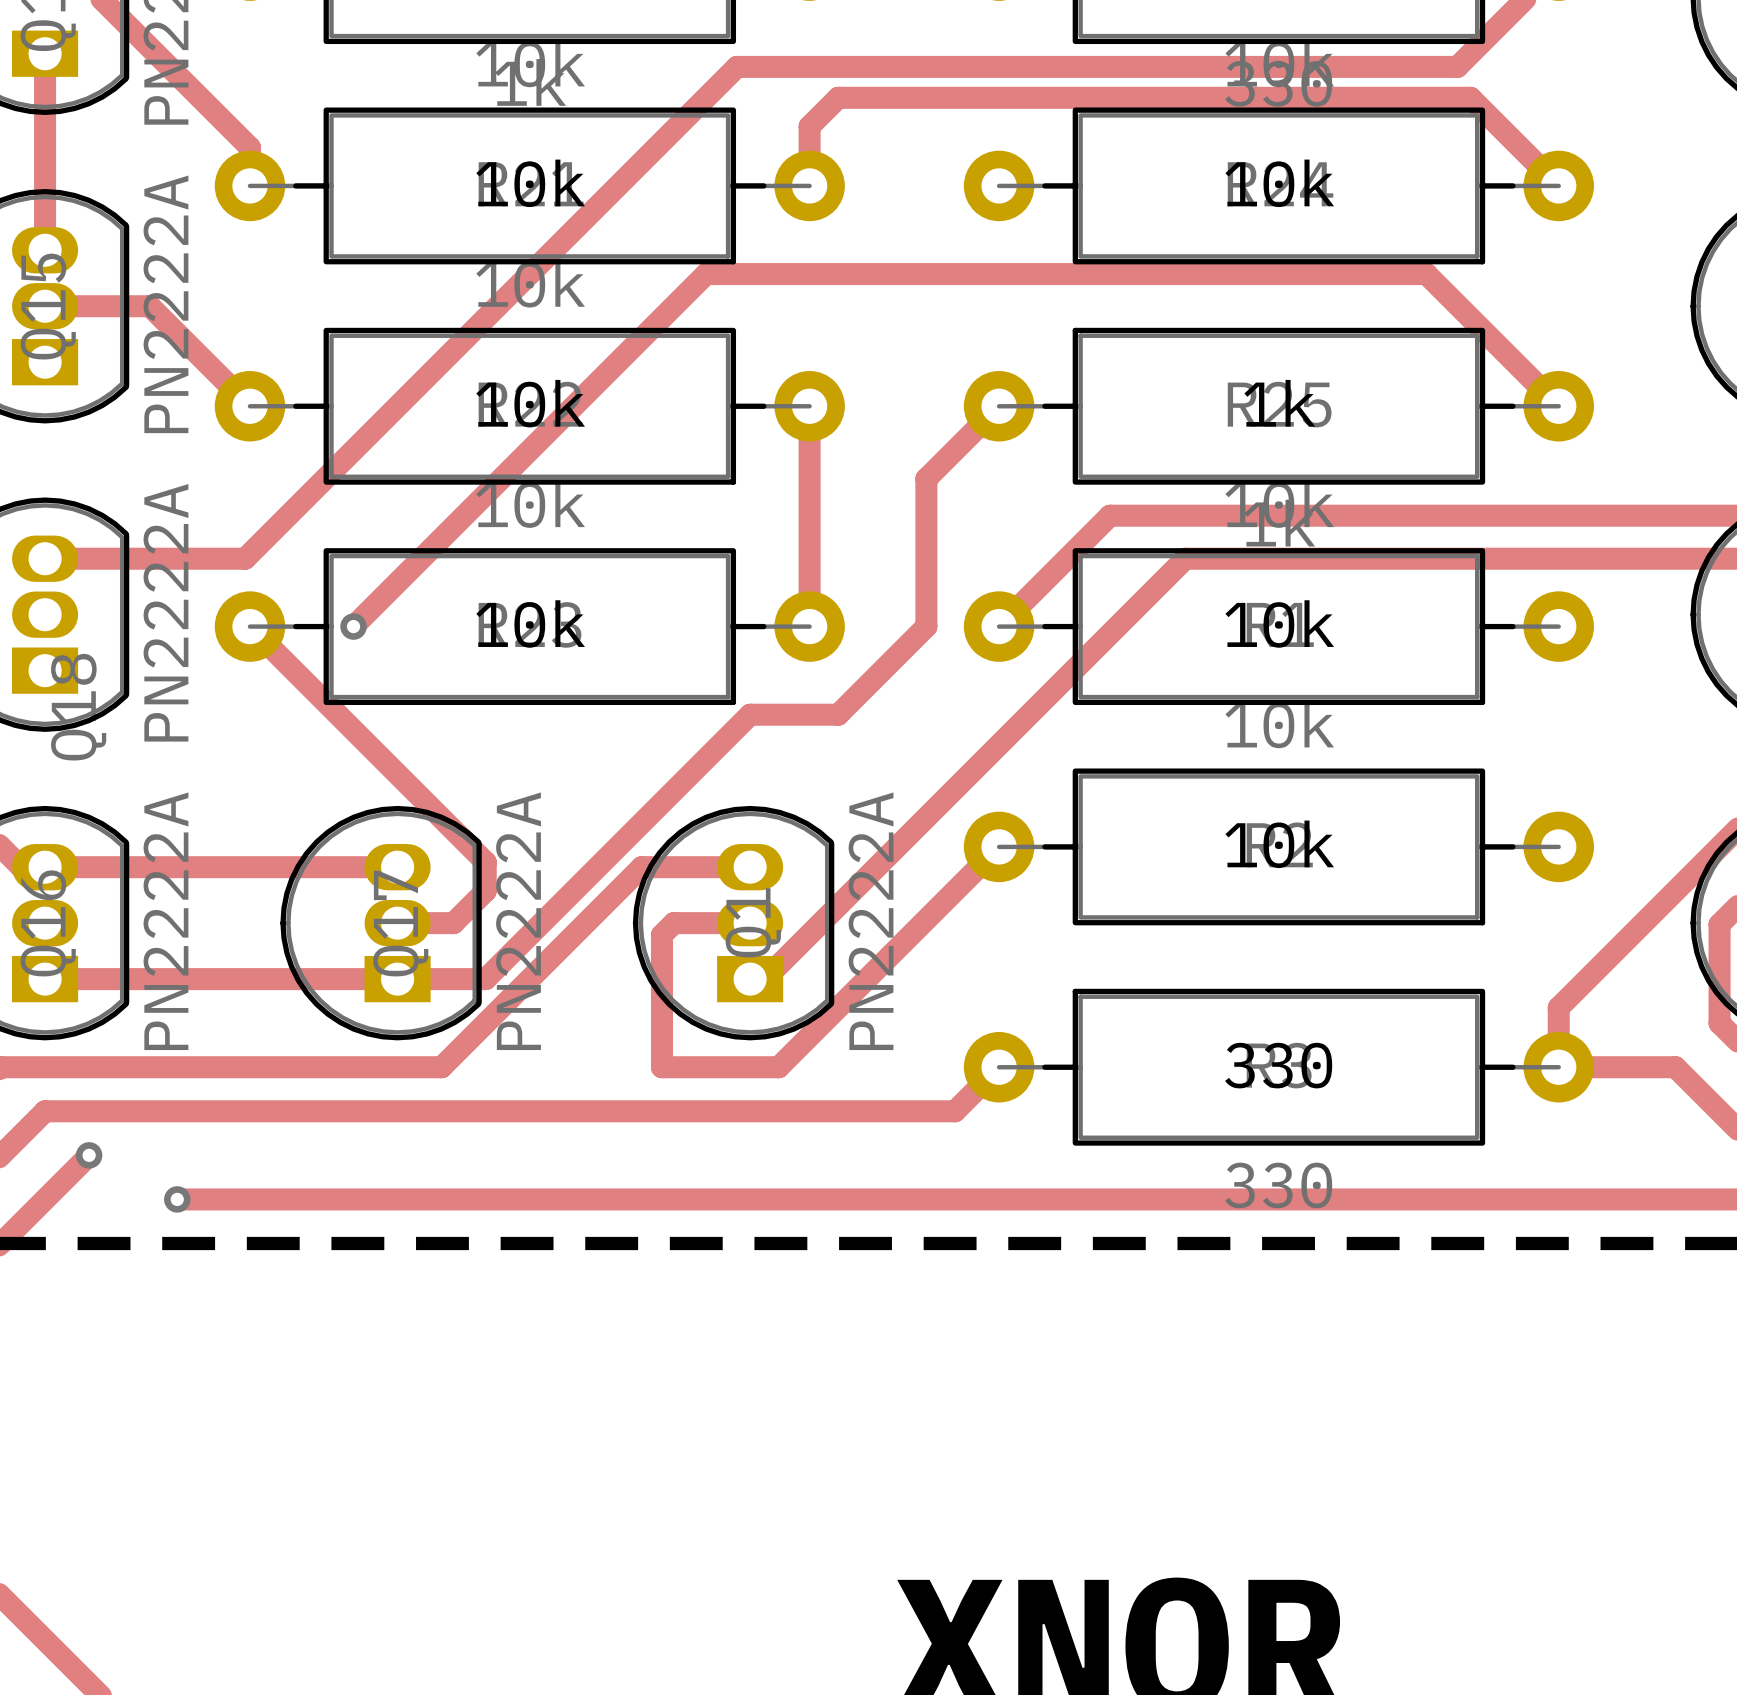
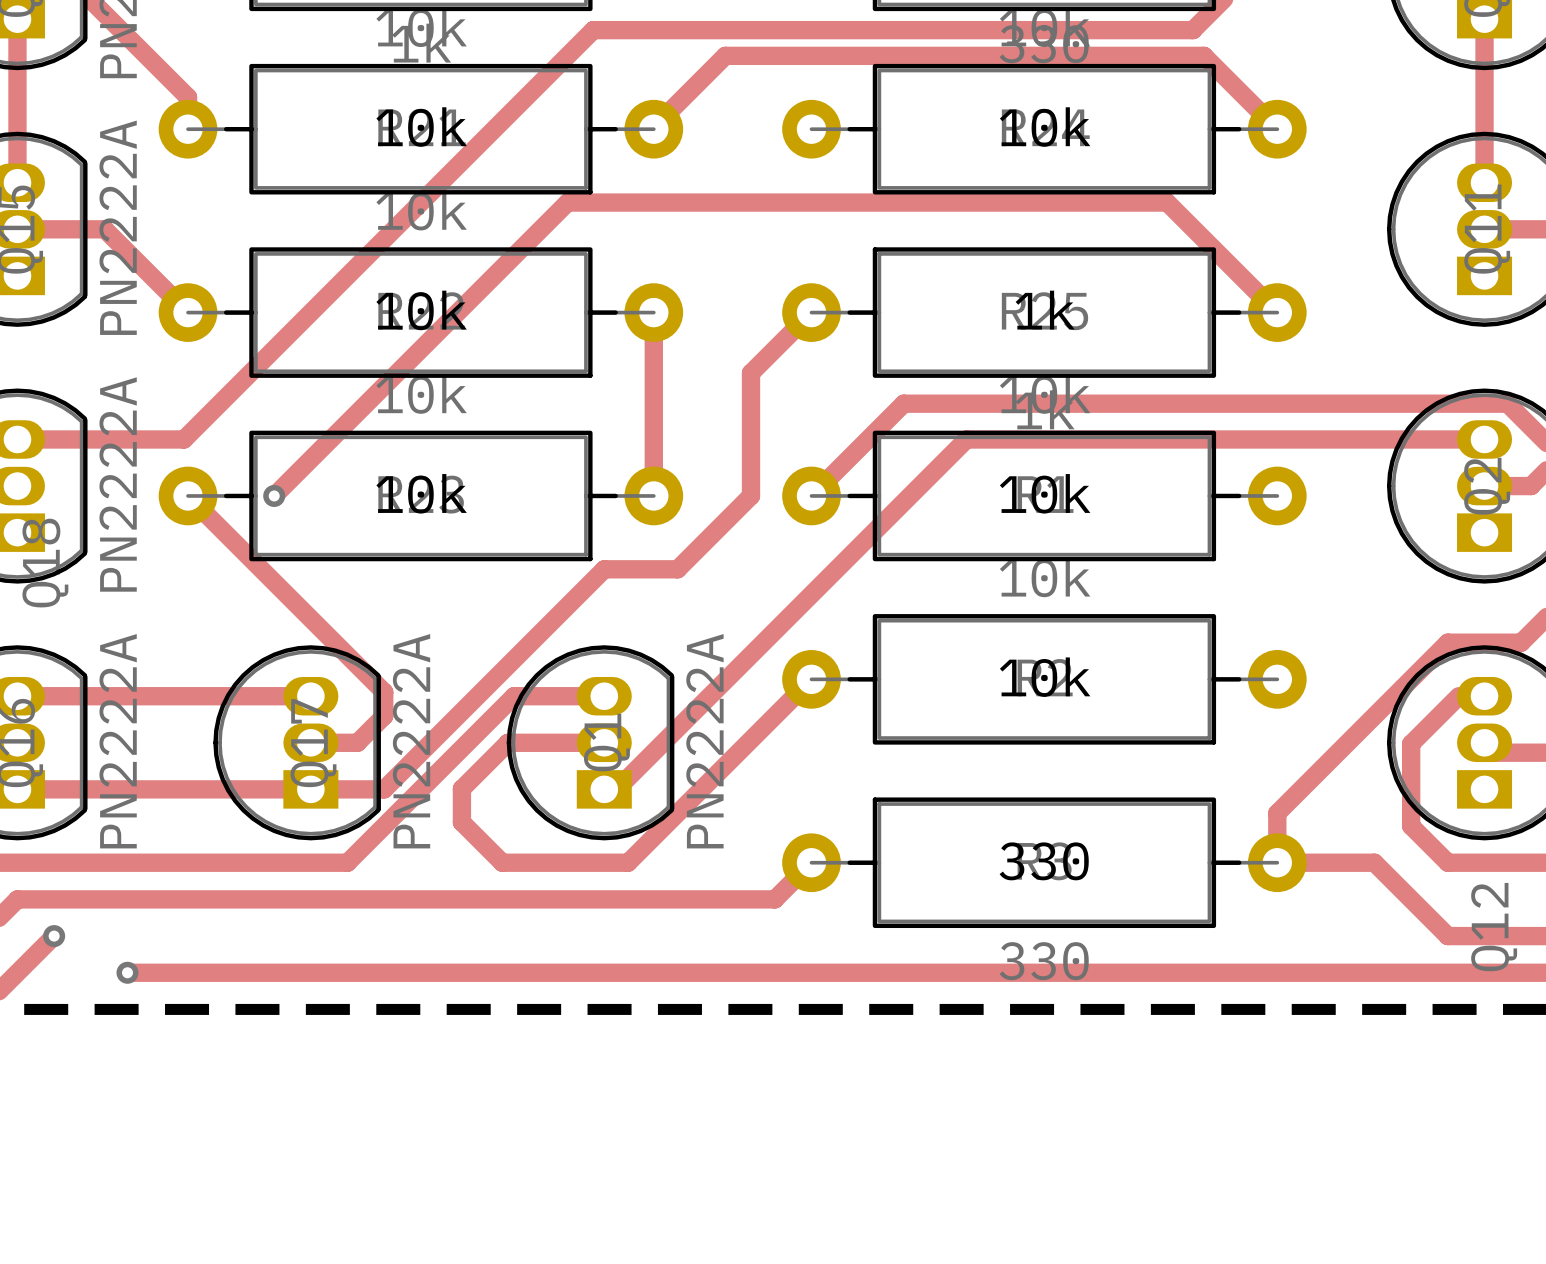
track: (895, 97) (838, 97) (809, 126) (809, 183) -> (725, 55) (653, 127)
track: (673, 923) (661, 935) (661, 1067) -> (540, 742) (508, 742) (461, 788) (461, 822) (502, 862) (530, 862)

